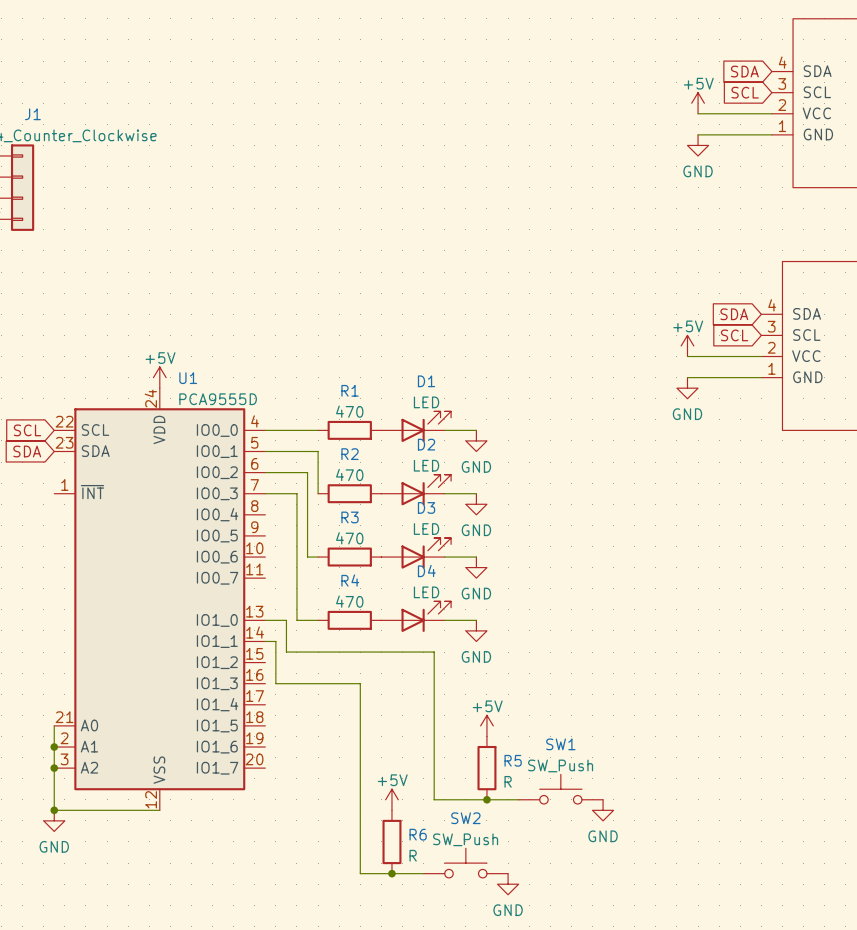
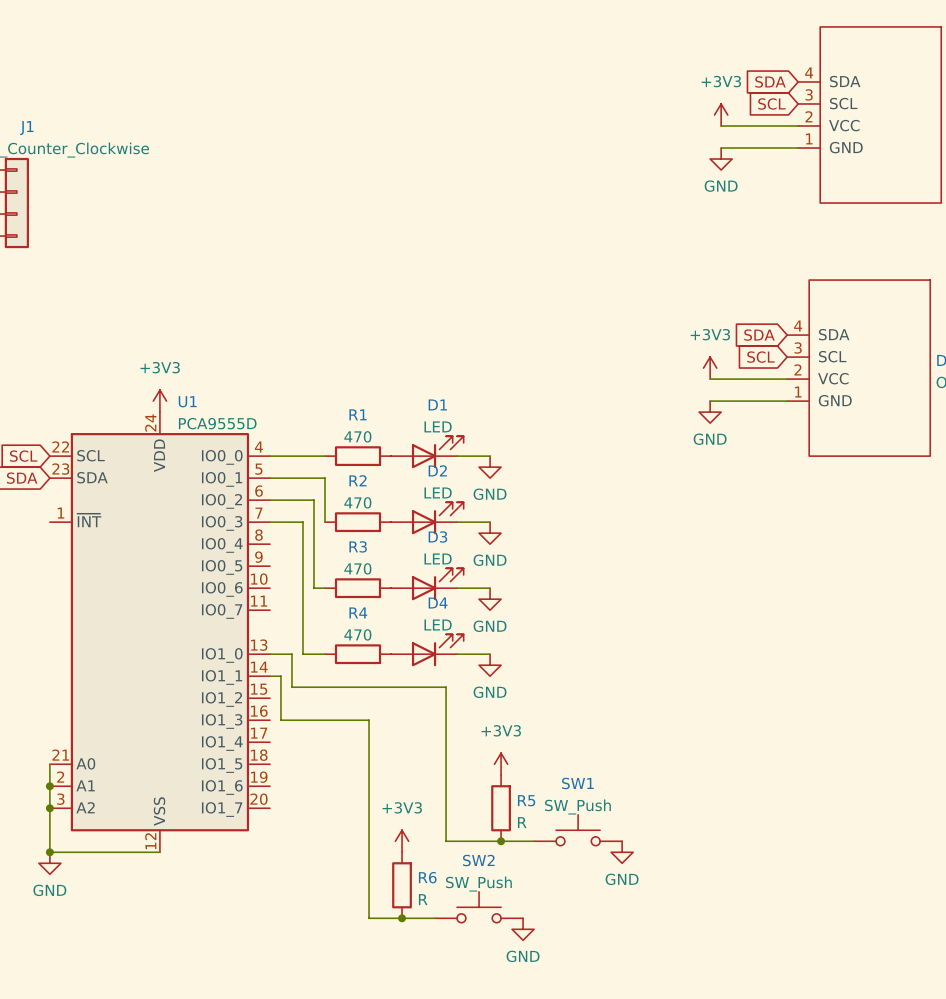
power symbol: +5V (698, 103) -> +3V3 (721, 114)
power symbol: +5V (687, 345) -> +3V3 (710, 368)
power symbol: +5V (159, 377) -> +3V3 (159, 401)
power symbol: +5V (486, 725) -> +3V3 (501, 764)
power symbol: +5V (391, 799) -> +3V3 (402, 841)

